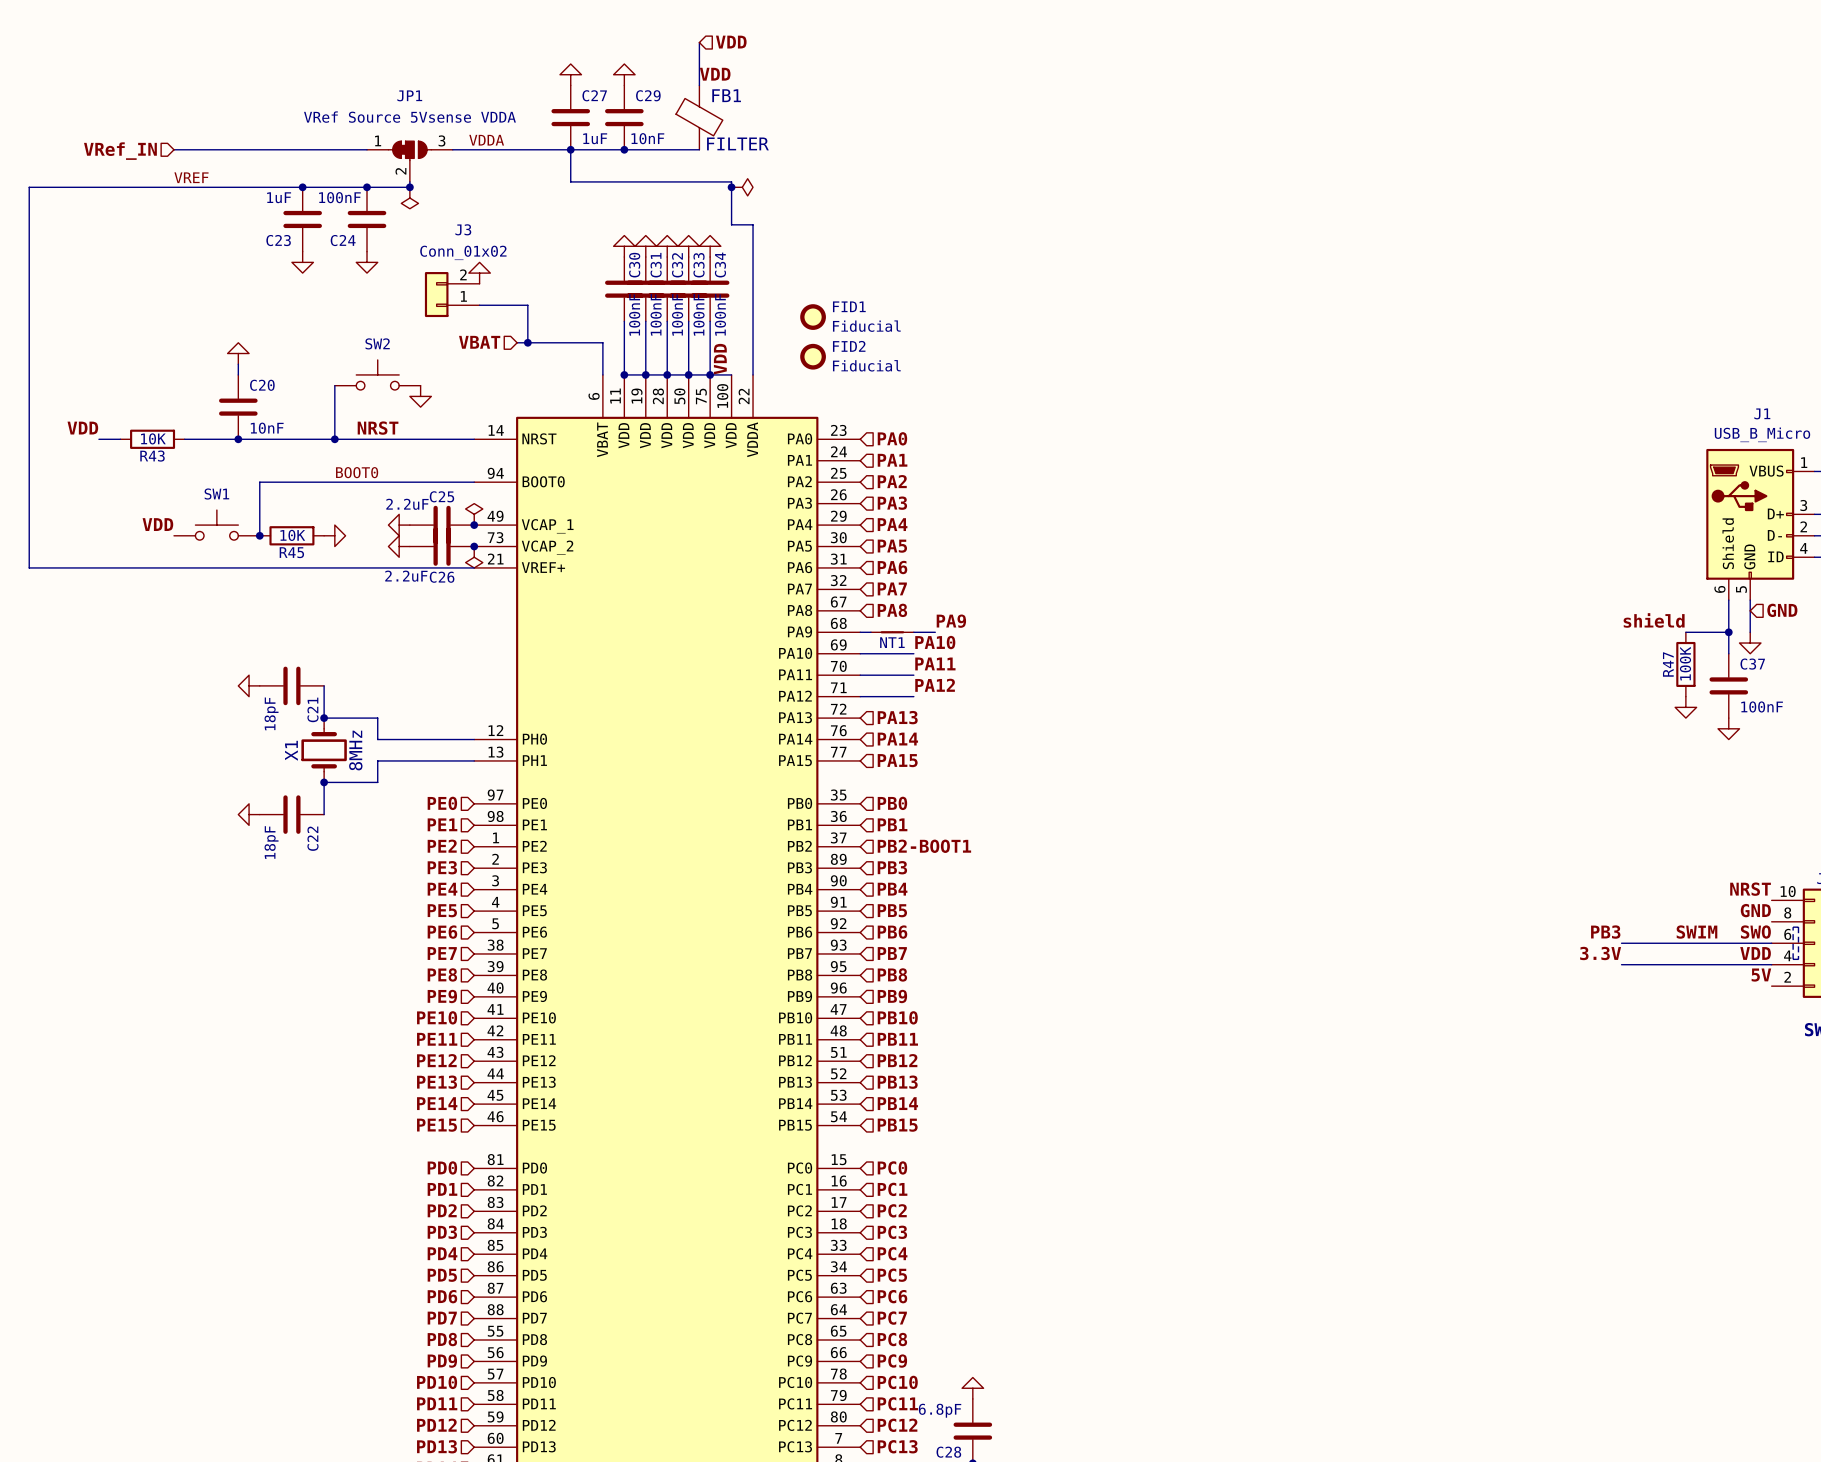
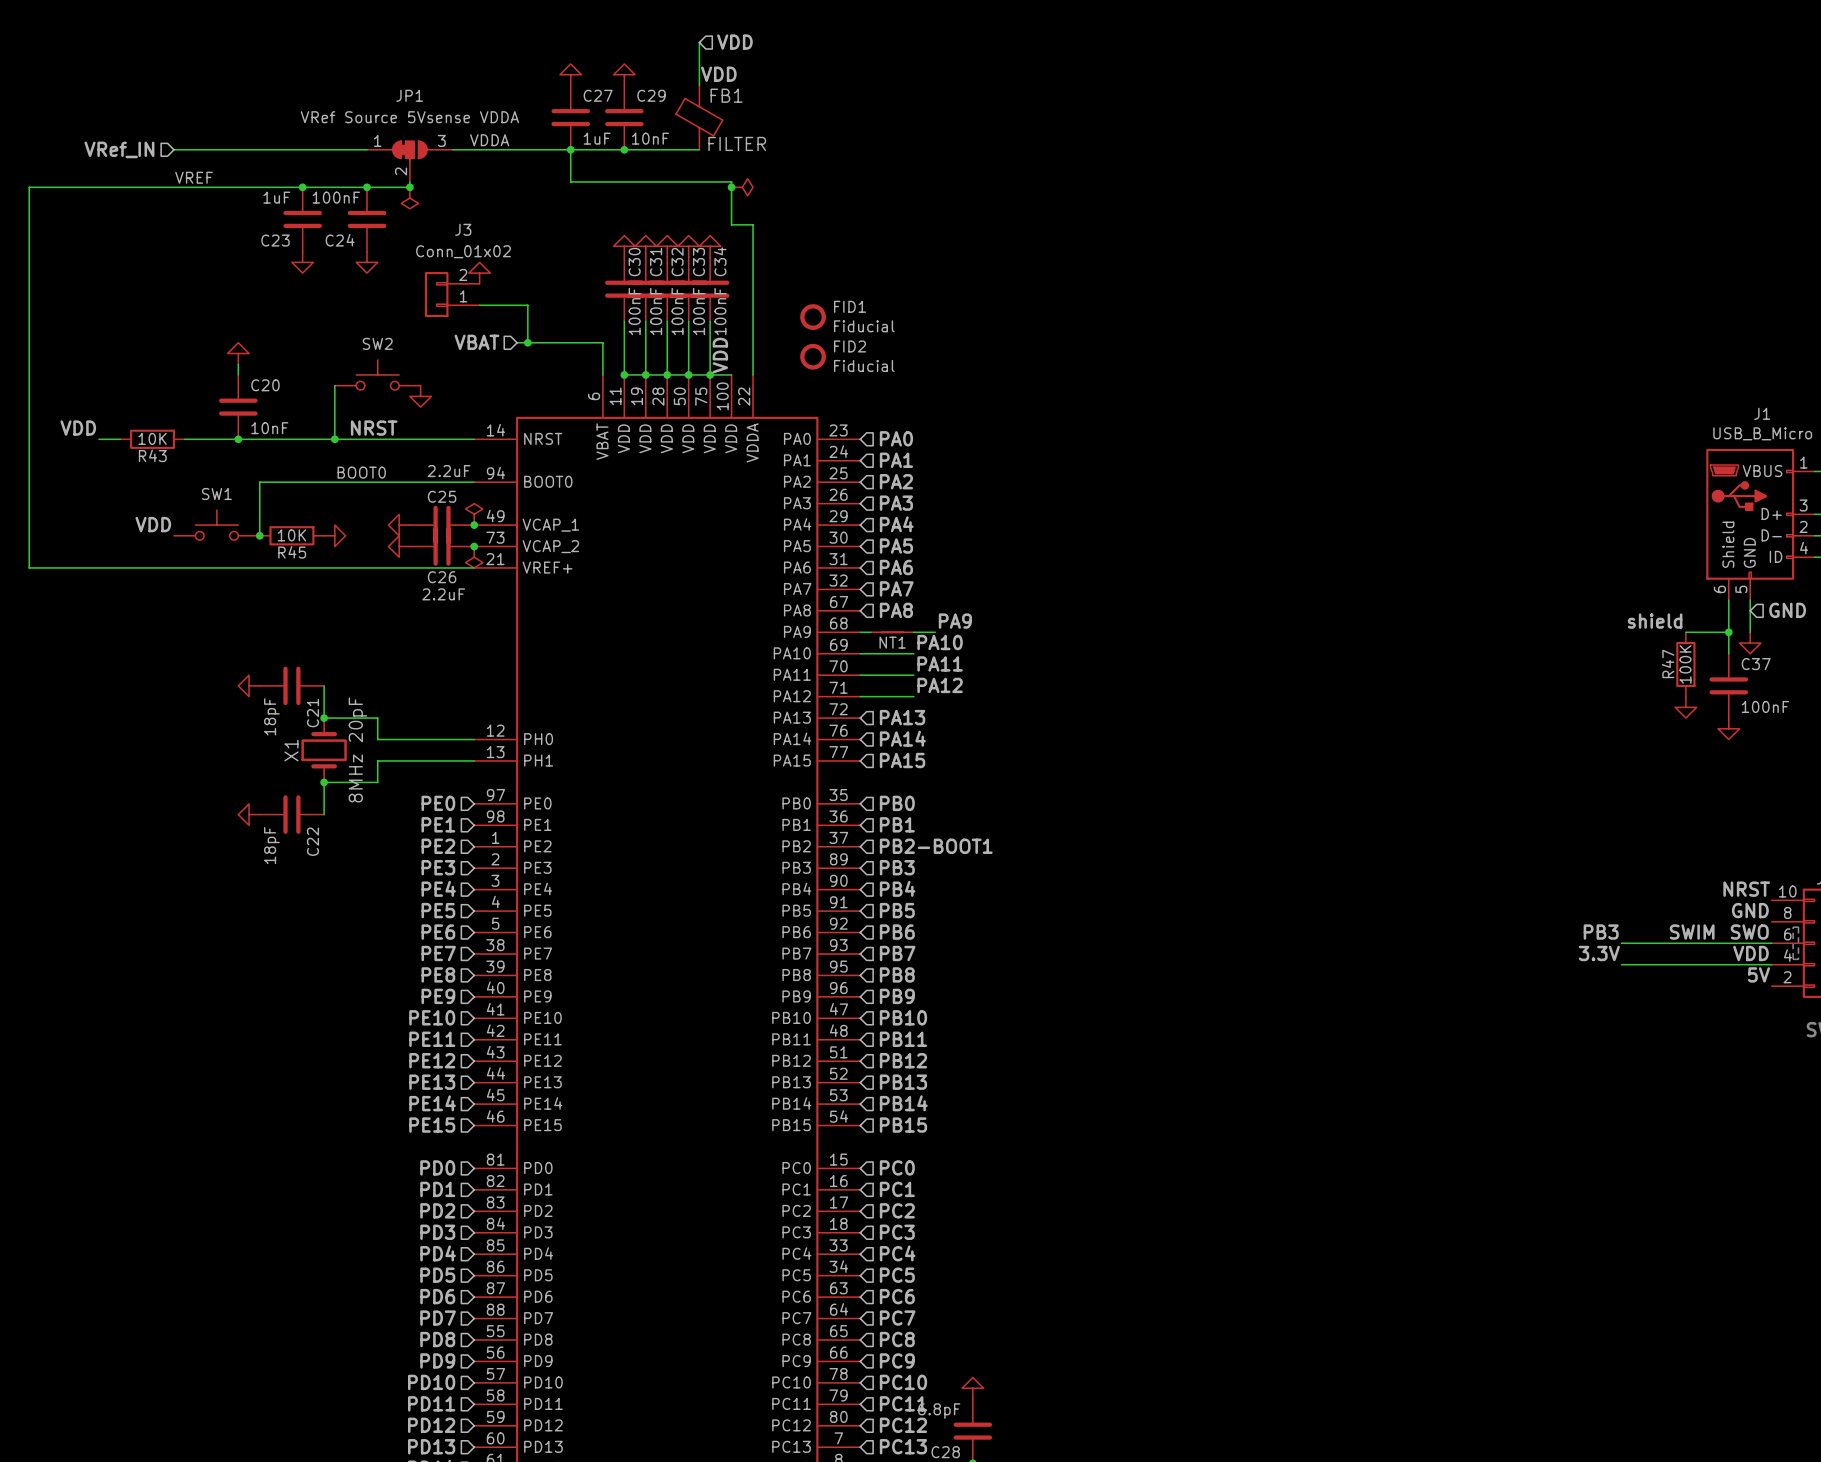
C25 value position: 2.2uF (407, 504) -> 2.2uF (449, 471)
C26 value position: 2.2uF (406, 576) -> 2.2uF (443, 594)
X1 value: 8MHz (355, 750) -> 8MHz 20pF (357, 749)

